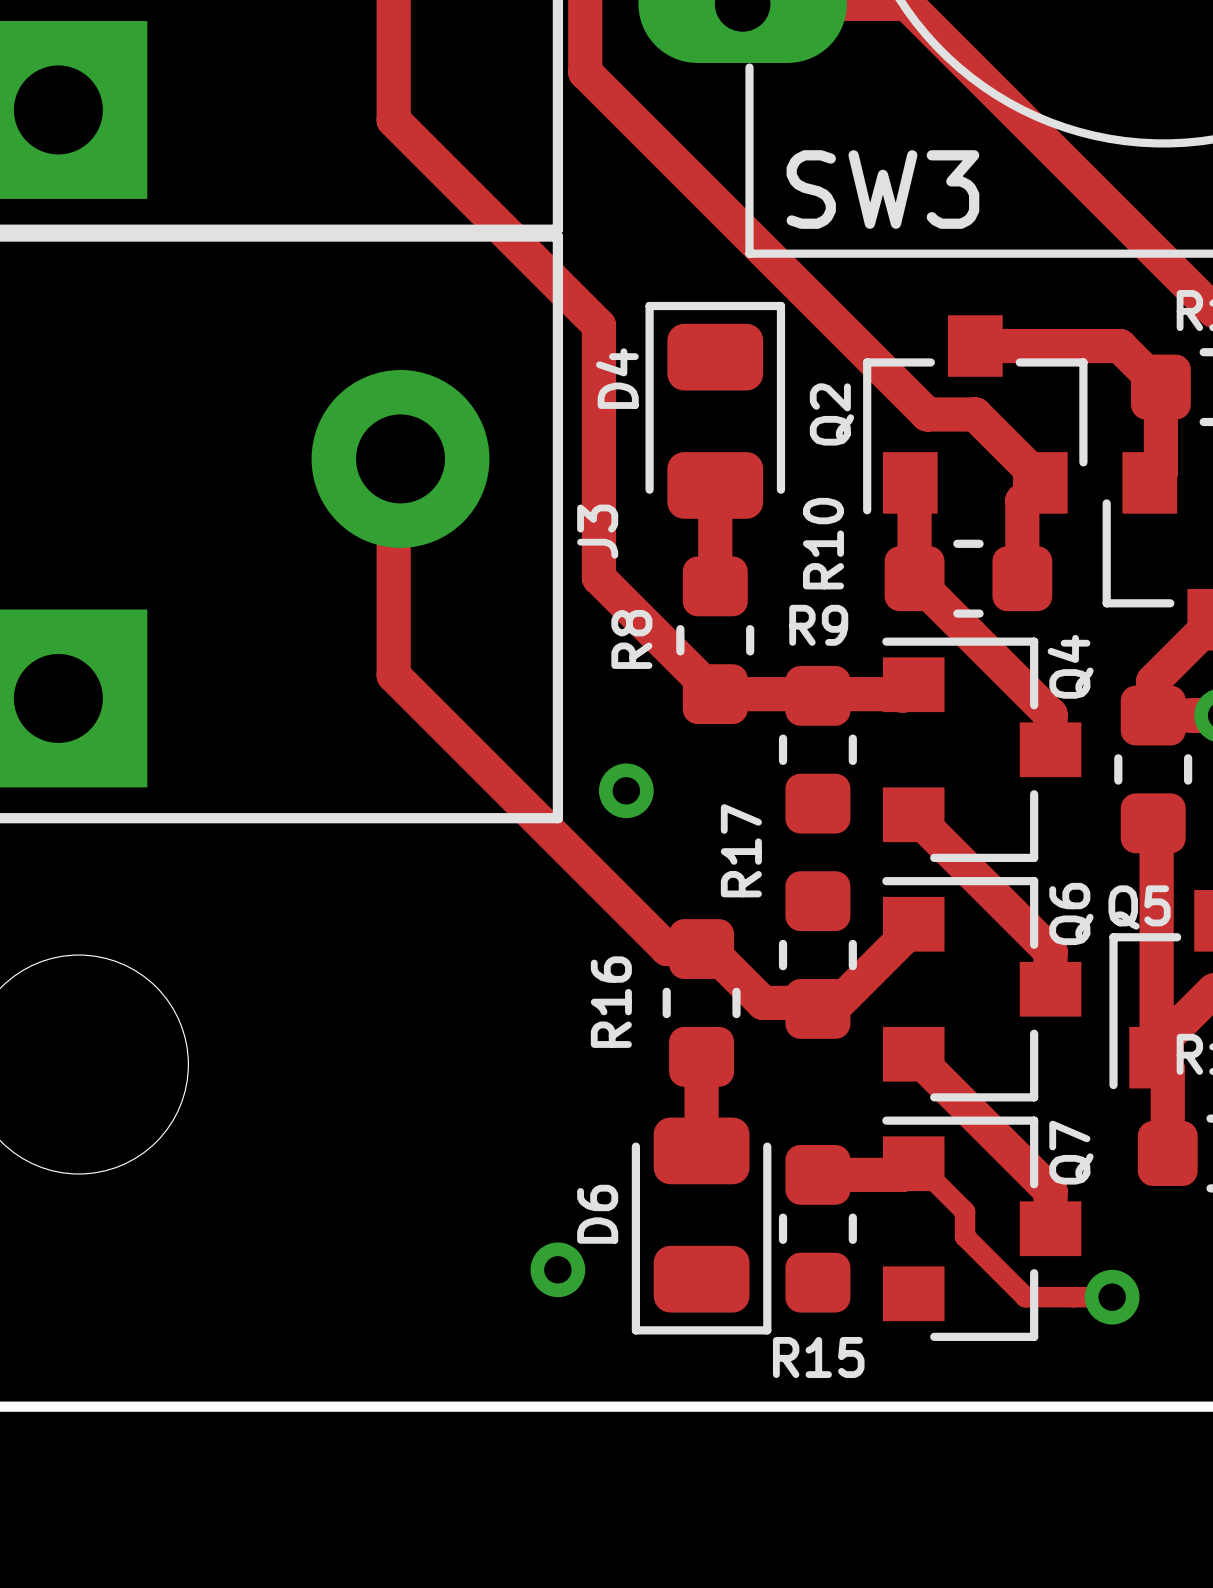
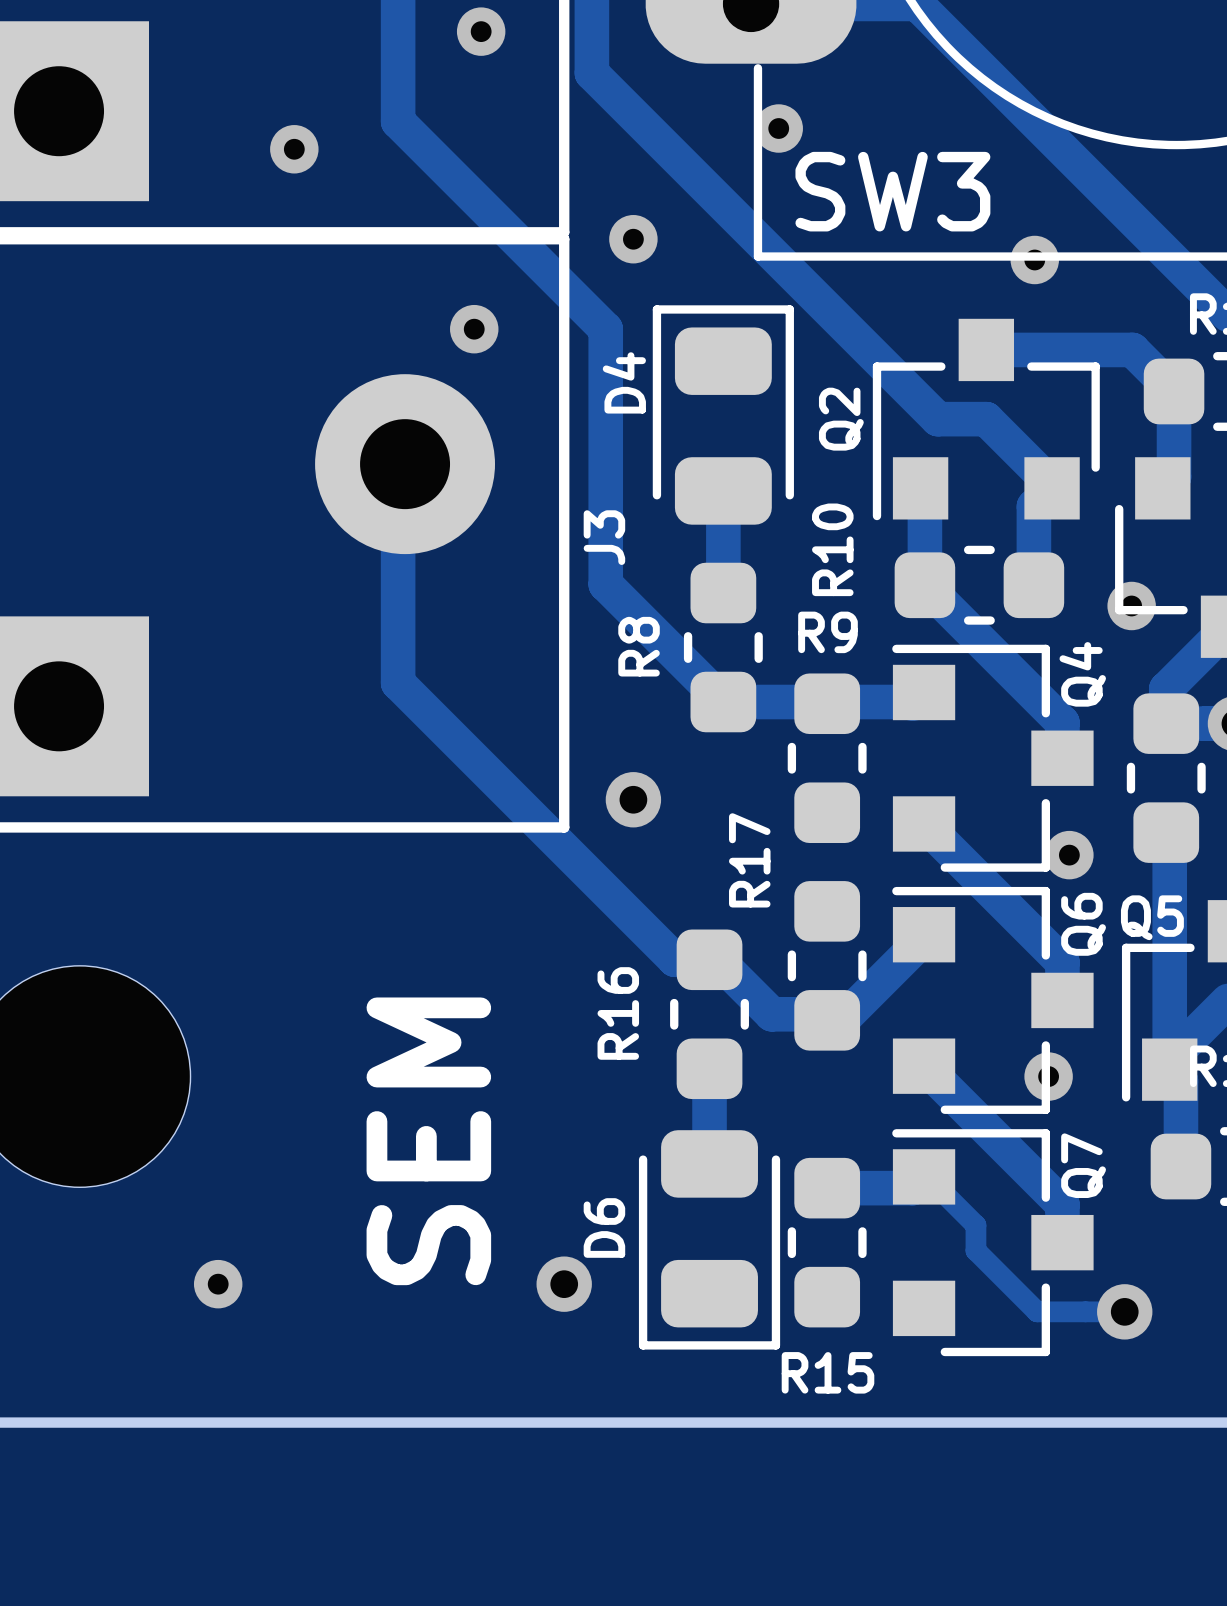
via: none -> (481, 31)
via: none -> (778, 128)
via: none -> (294, 149)
via: none -> (633, 239)
via: none -> (1034, 259)
via: none -> (474, 329)
via: none -> (1131, 605)
via: none -> (1069, 855)
via: none -> (1048, 1076)
text: none -> SEM (428, 1141)
via: none -> (218, 1284)

